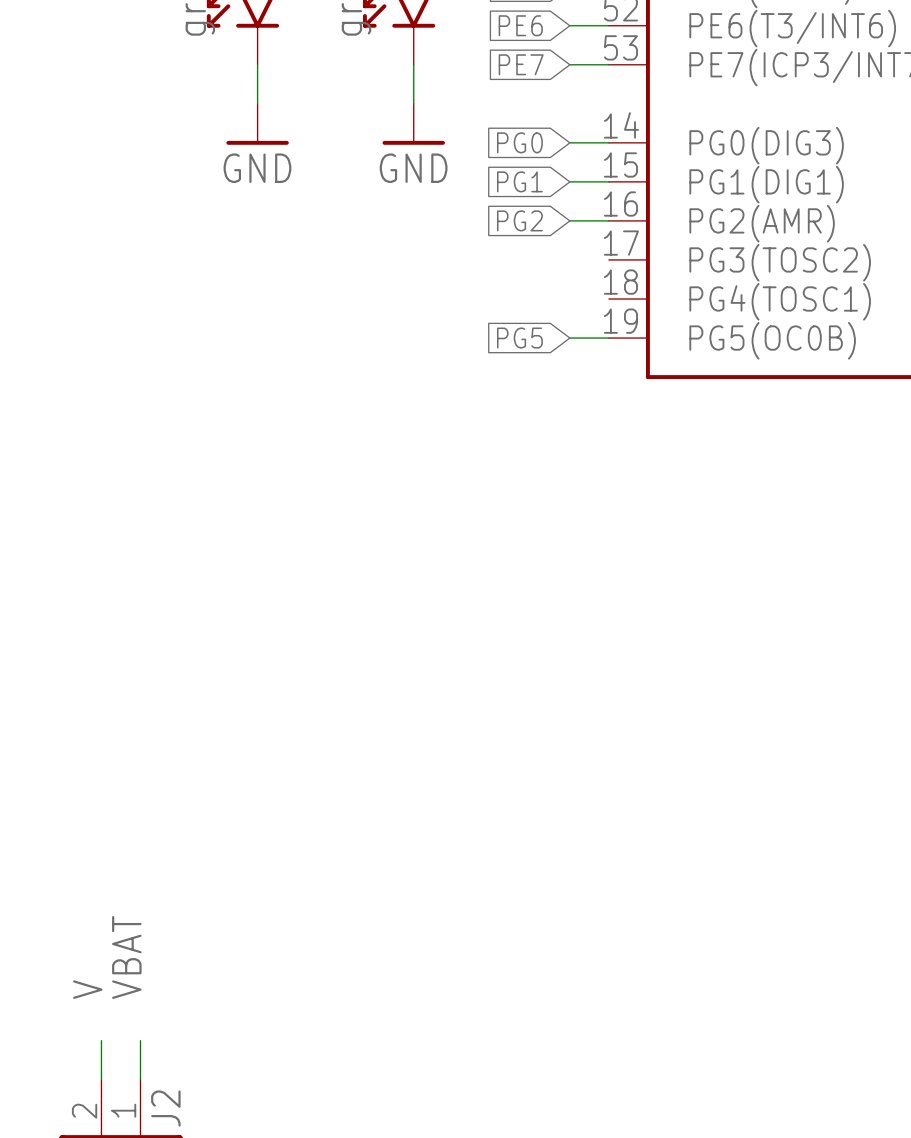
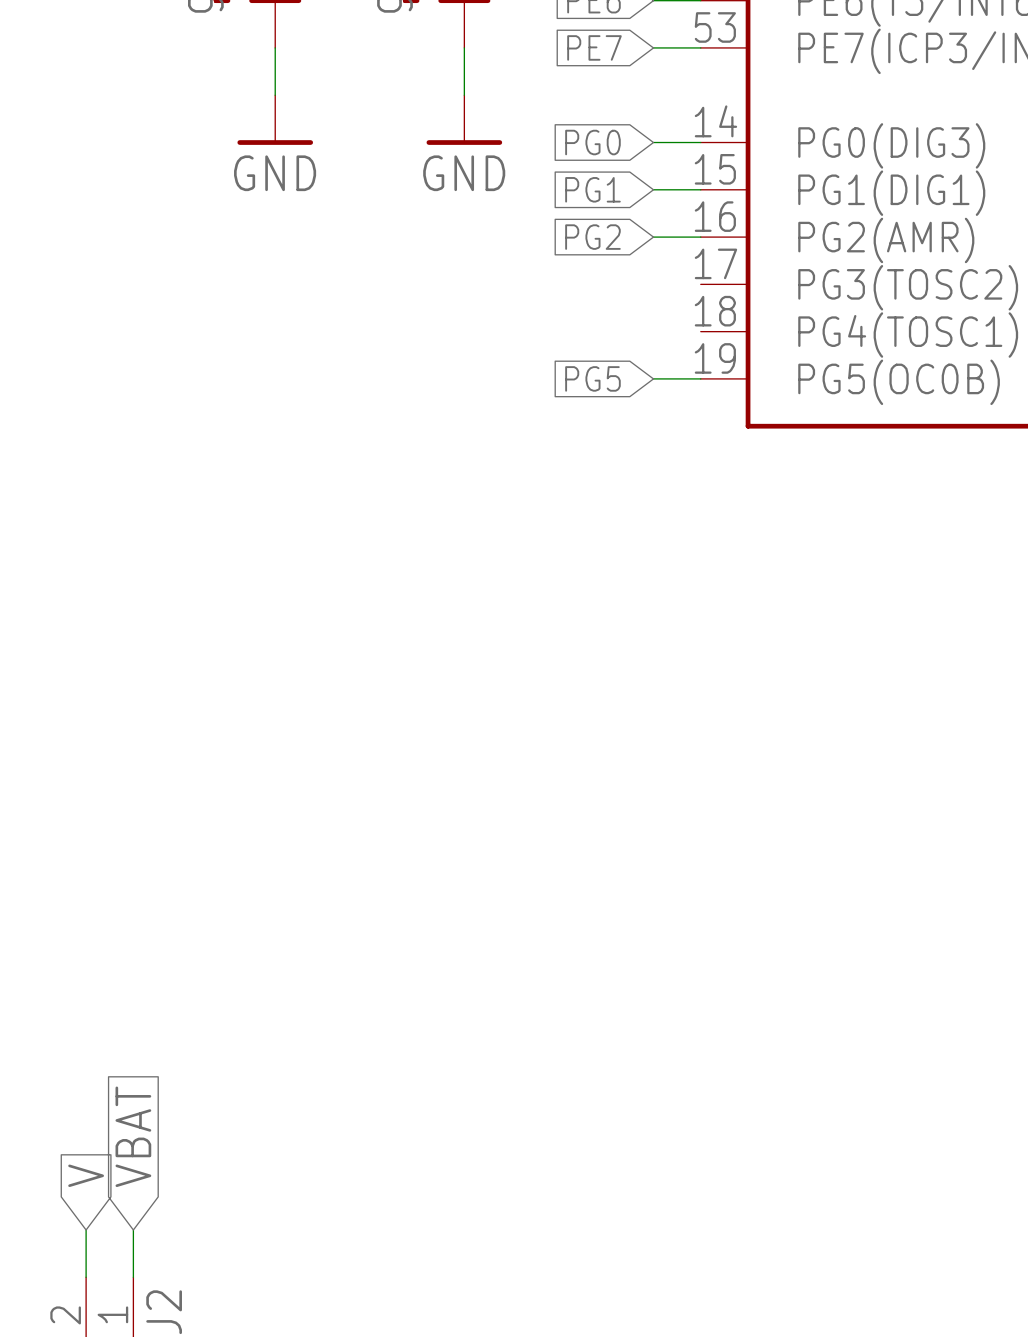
label: VBAT (126, 957) -> none
global label: none -> VBAT (133, 1136)
label: V (87, 989) -> none
global label: none -> V (86, 1175)

